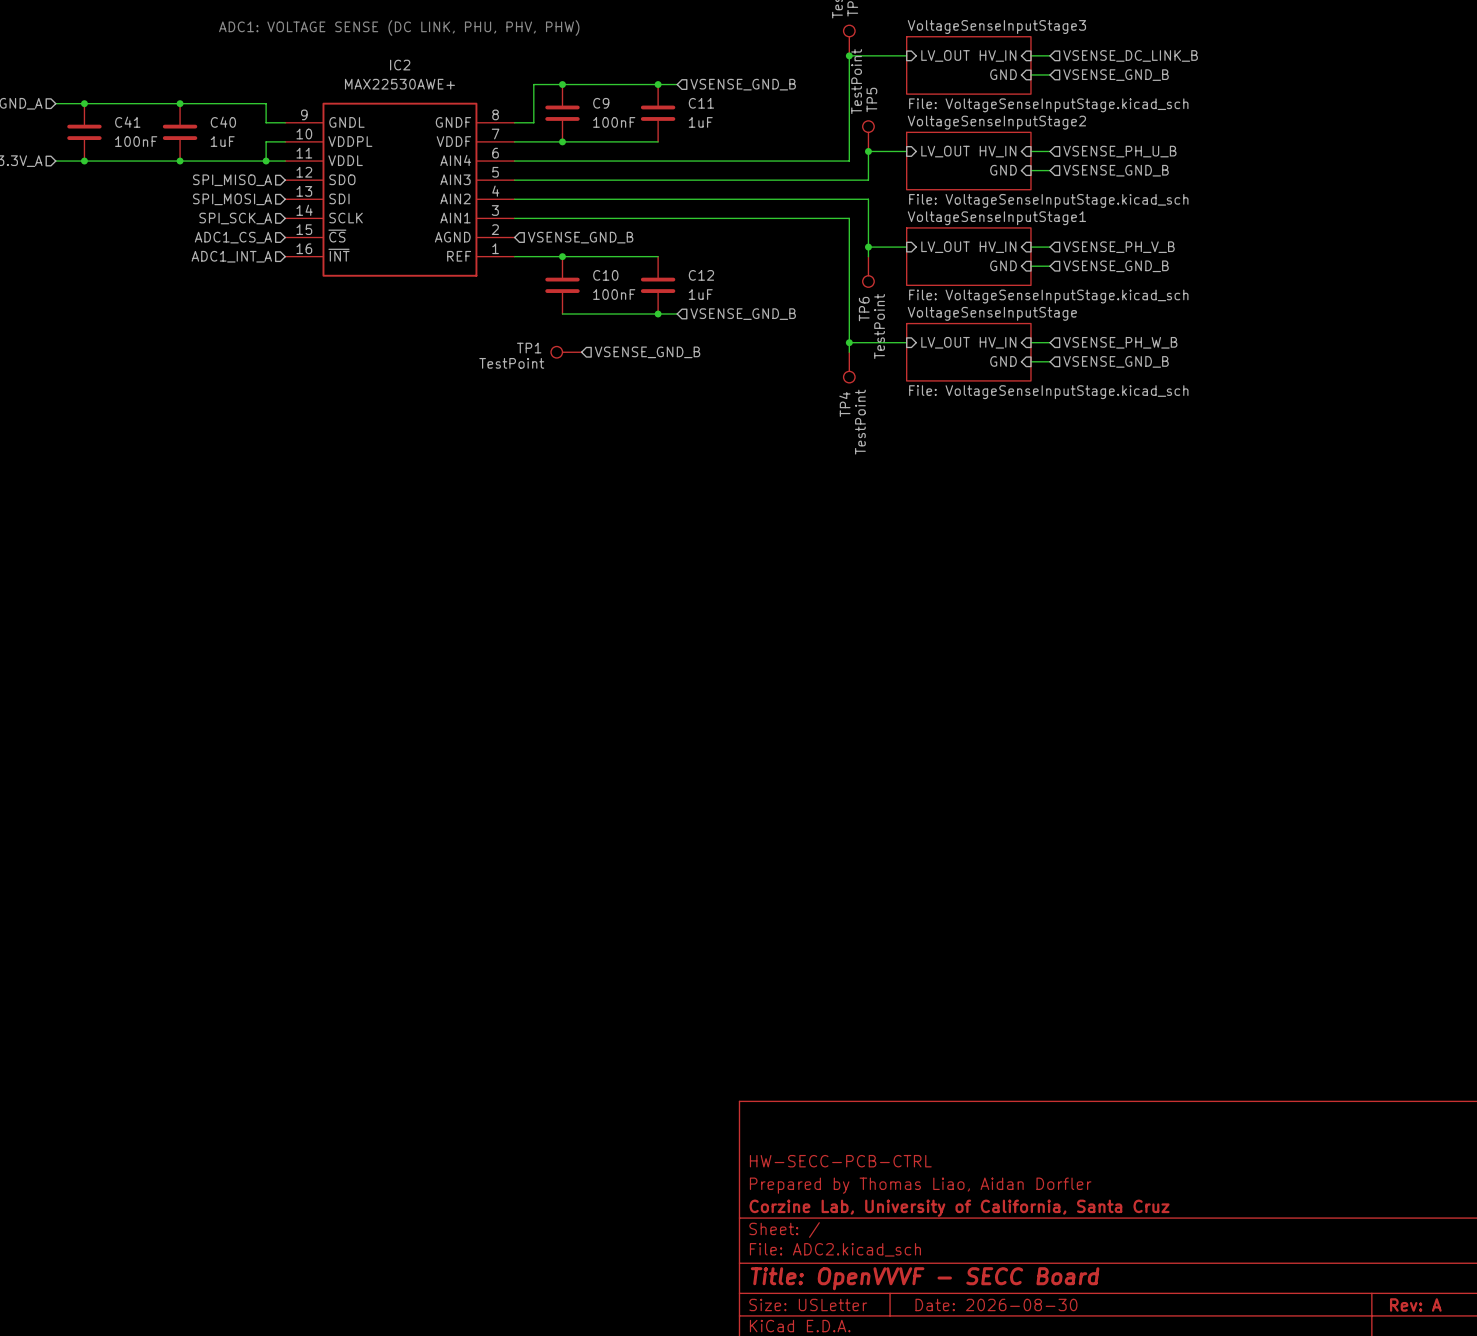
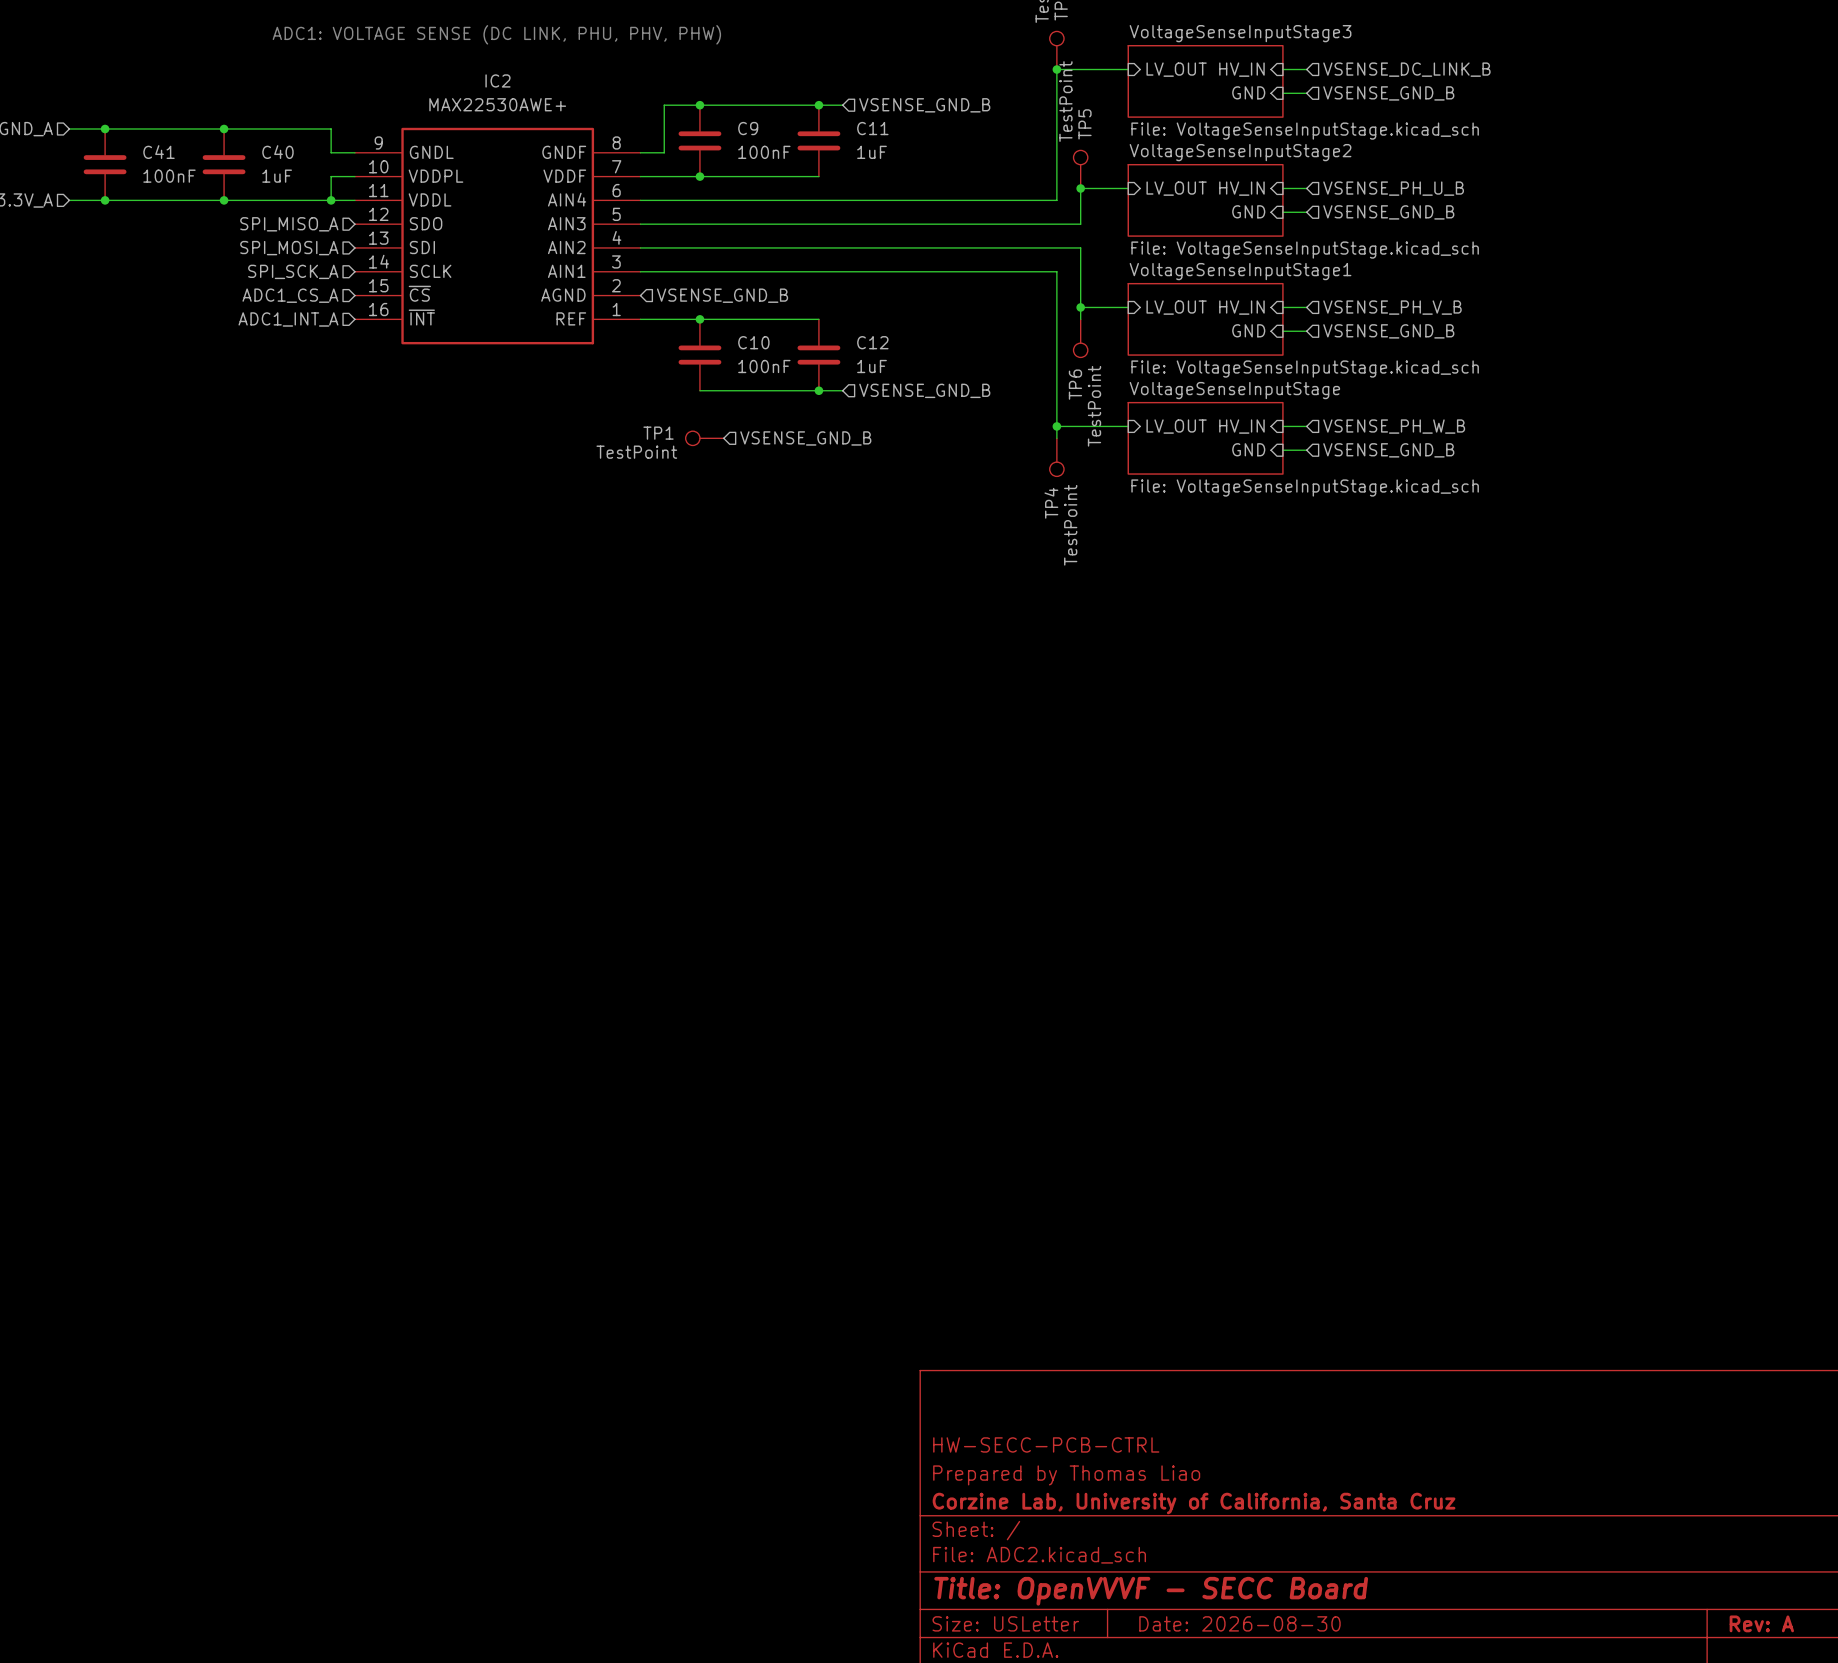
title block: Prepared by Thomas Liao, Aidan Dorfler (920, 1185) -> Prepared by Thomas Liao (1066, 1475)

